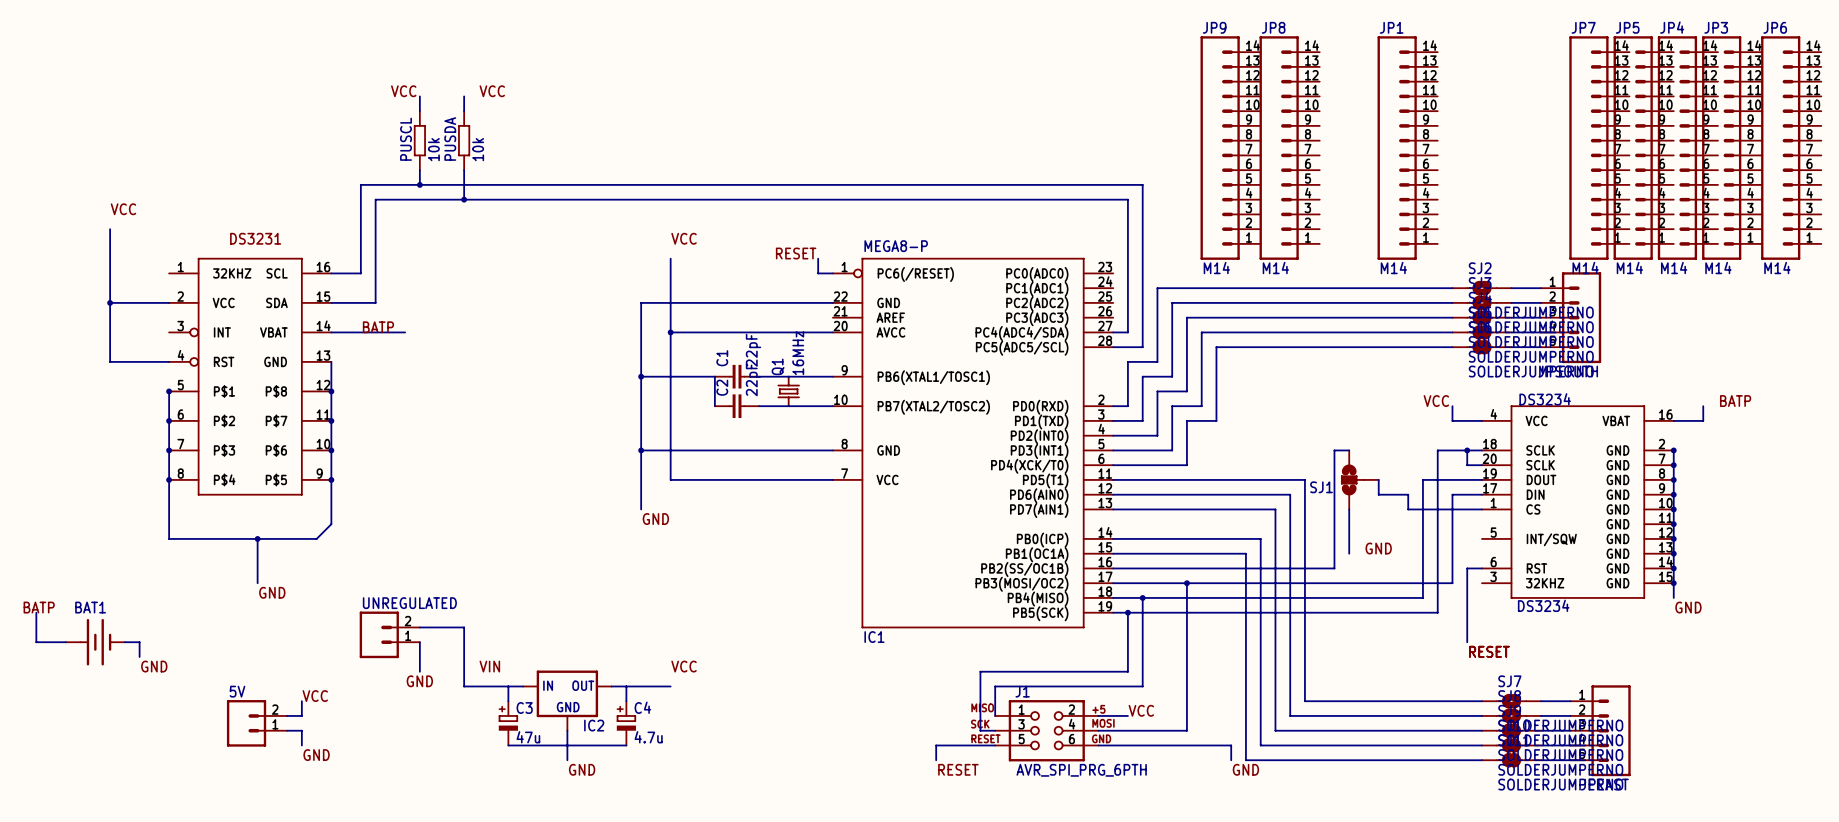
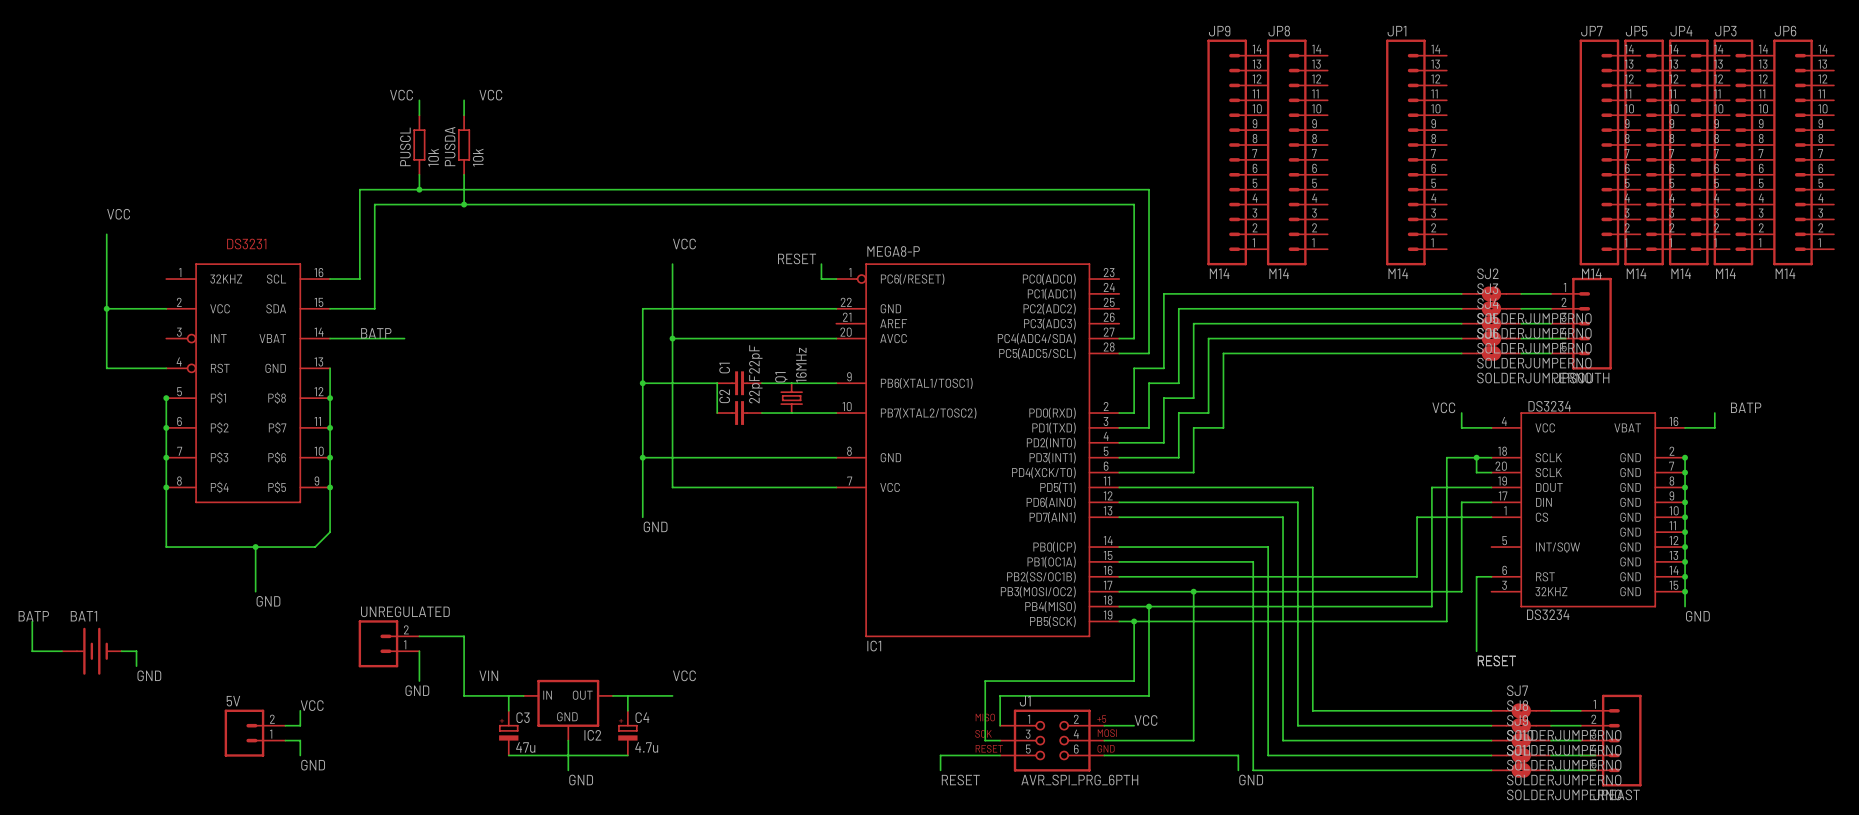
wire: (1349, 450) (1334, 450) (1334, 568) -> (1417, 517) (1417, 576) (1342, 576)
SJ1: (1360, 479) -> none
wire: (1378, 479) (1378, 494) (1408, 494) (1408, 509) -> none
wire: (1349, 509) (1349, 553) -> none
label: GND (1378, 548) -> none

